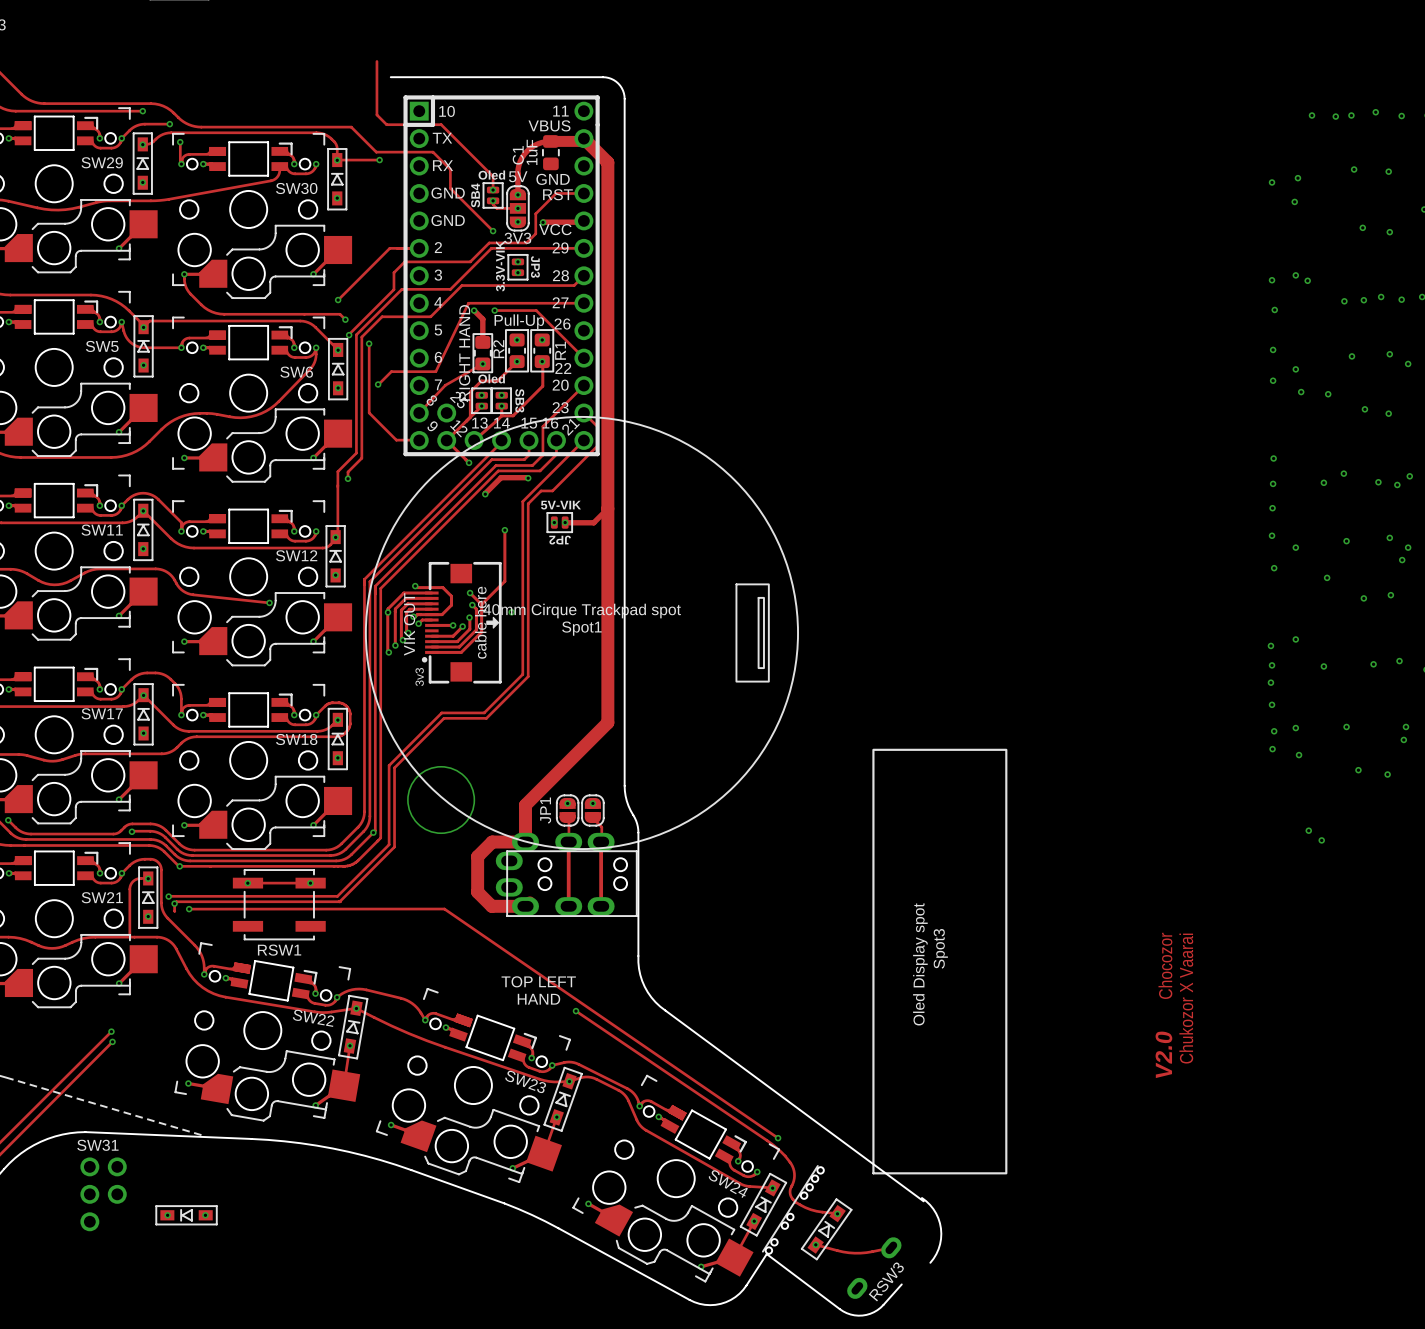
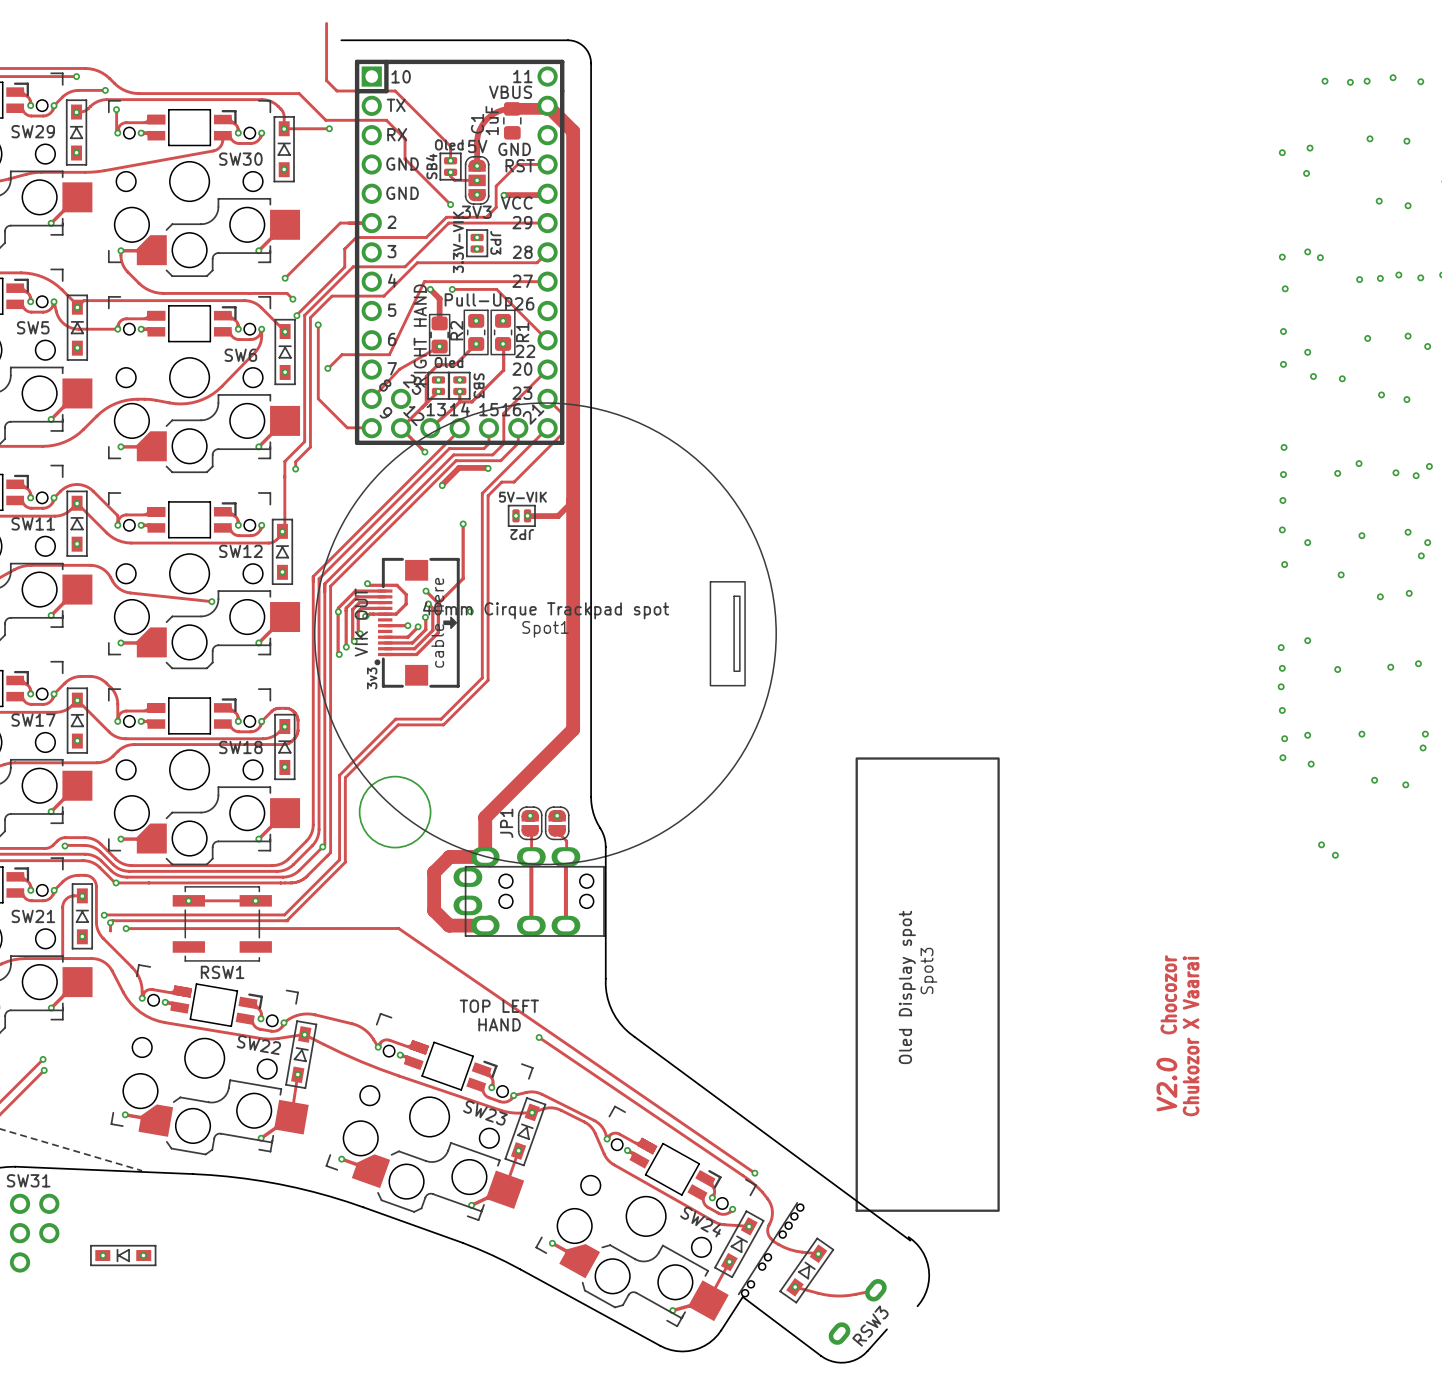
track: (431, 620) (422, 620) (418, 623) -> none
via: (418, 623) -> none

